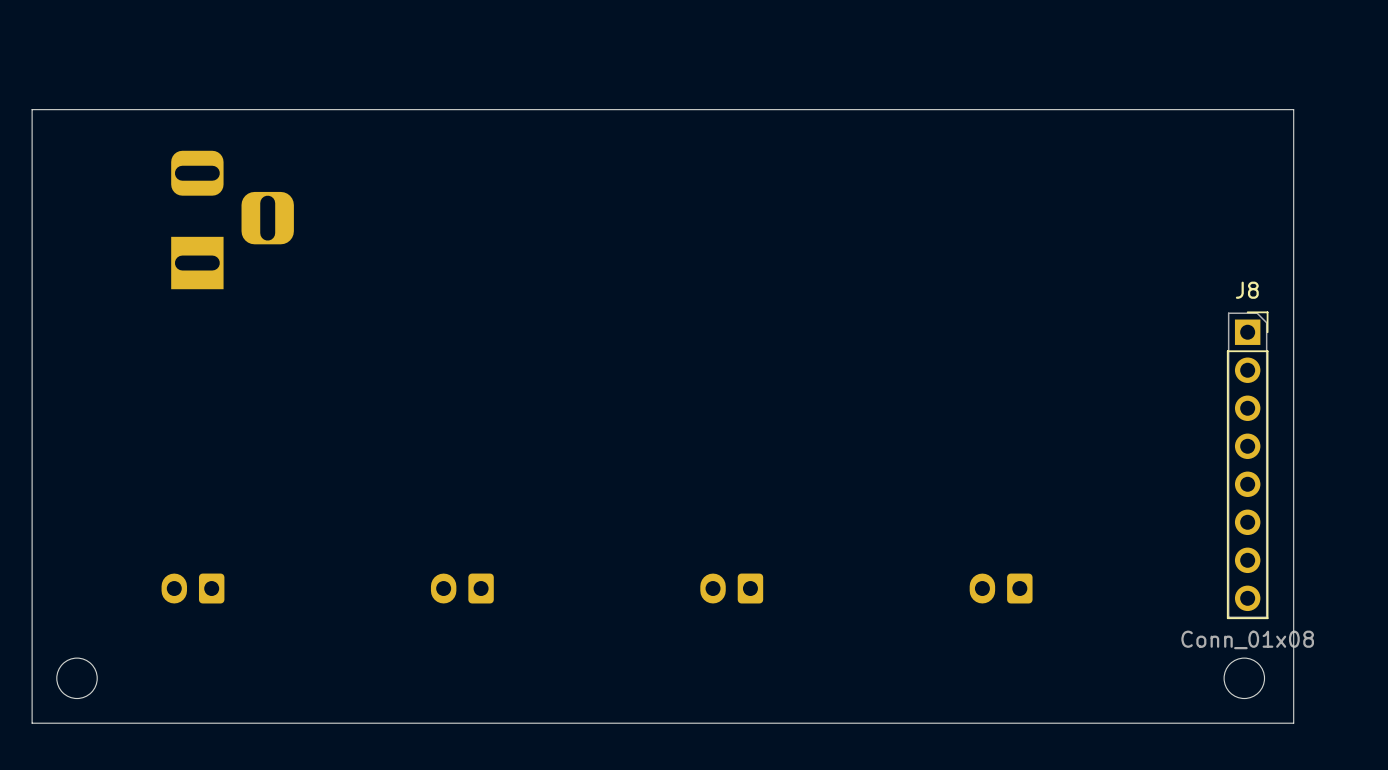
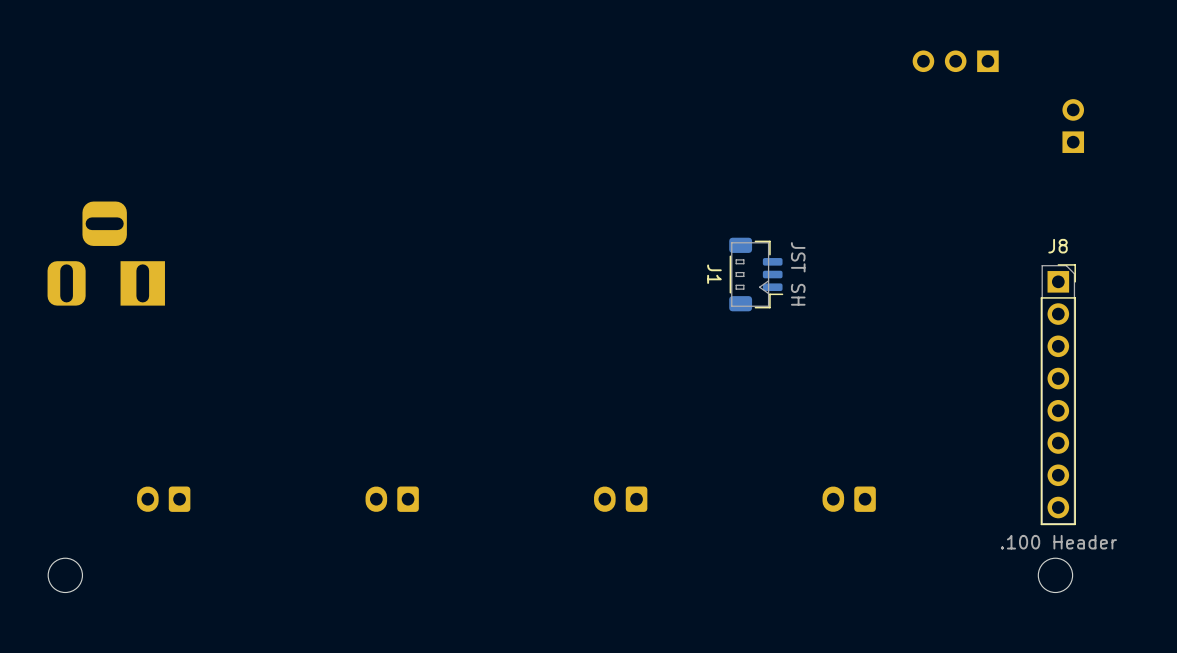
part: none -> (955, 61)
board edge: (1293, 109) (32, 109) (32, 723) (1293, 723) (1293, 109) -> none
part: none -> (1073, 126)
part rotation: 0° (232, 220) -> 90° counterclockwise (106, 253)
part position: (232, 220) -> (106, 253)
J1: none -> JST SH (756, 274)
J8 value: Conn_01x08 (1247, 639) -> .100 Header (1058, 542)

